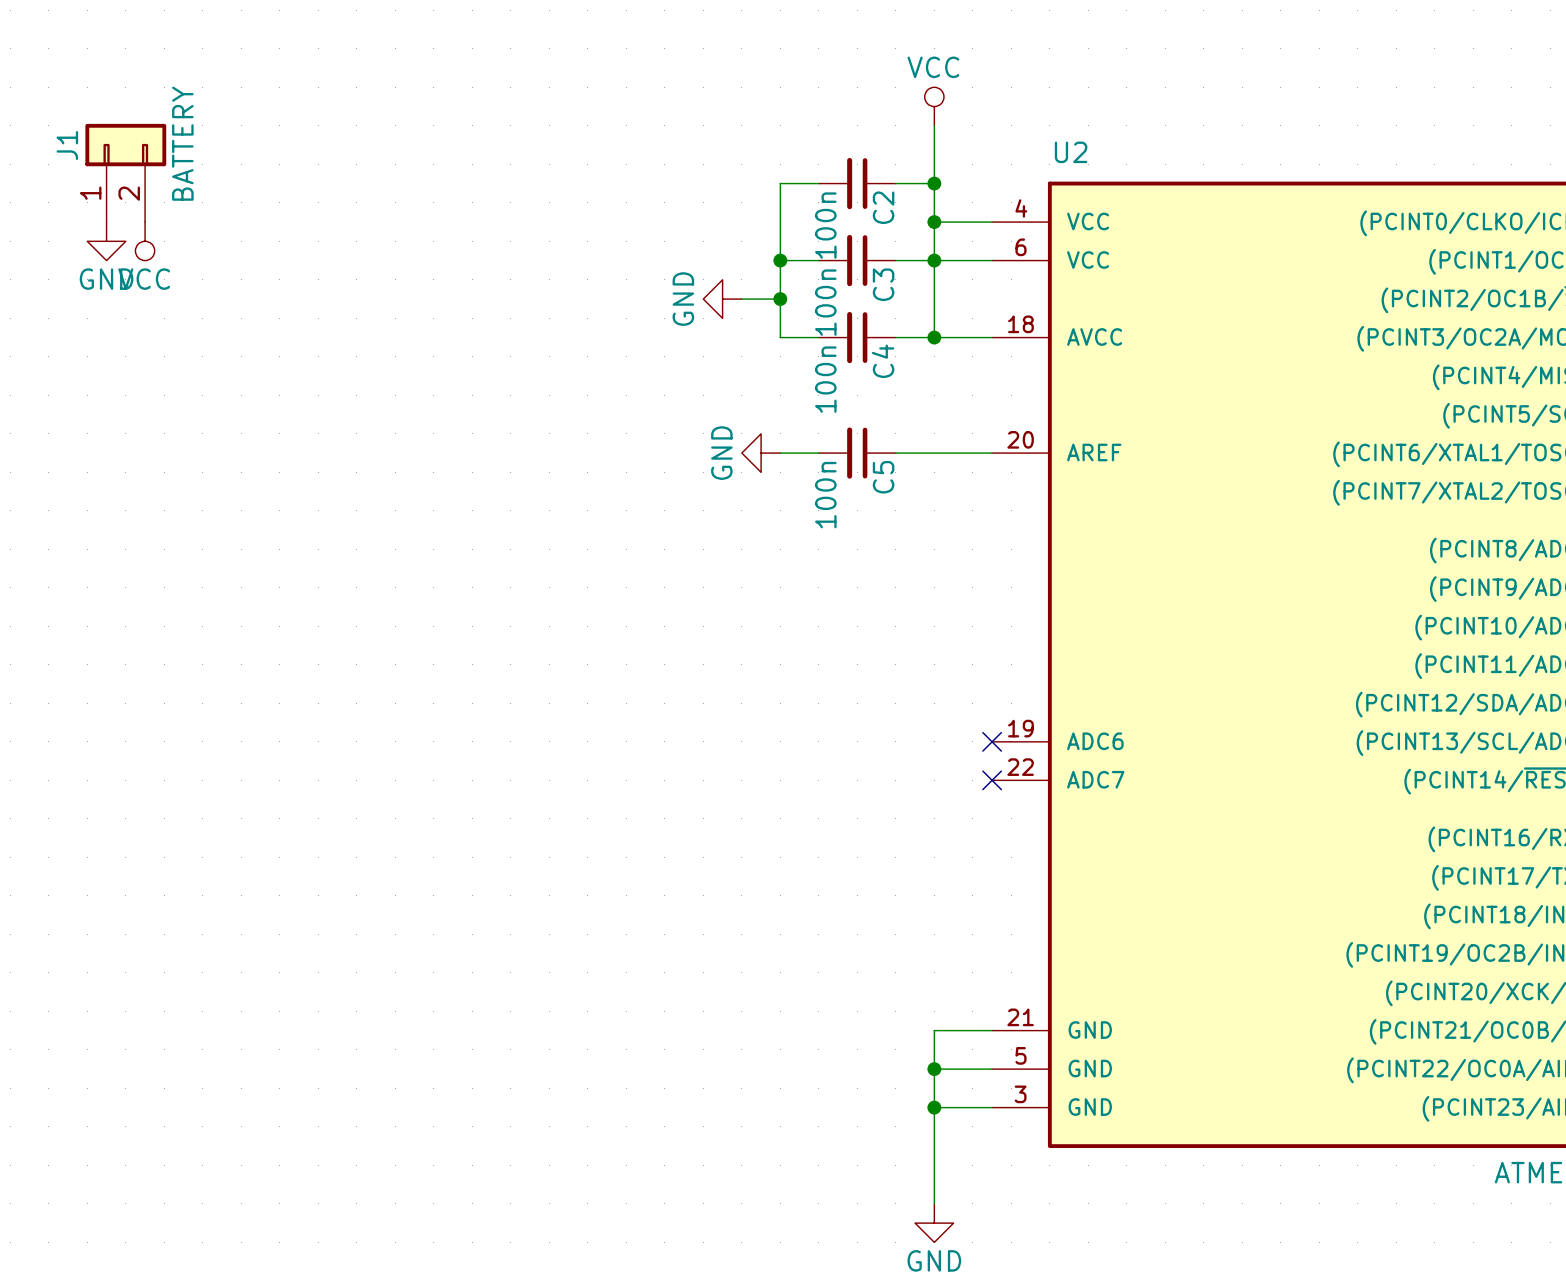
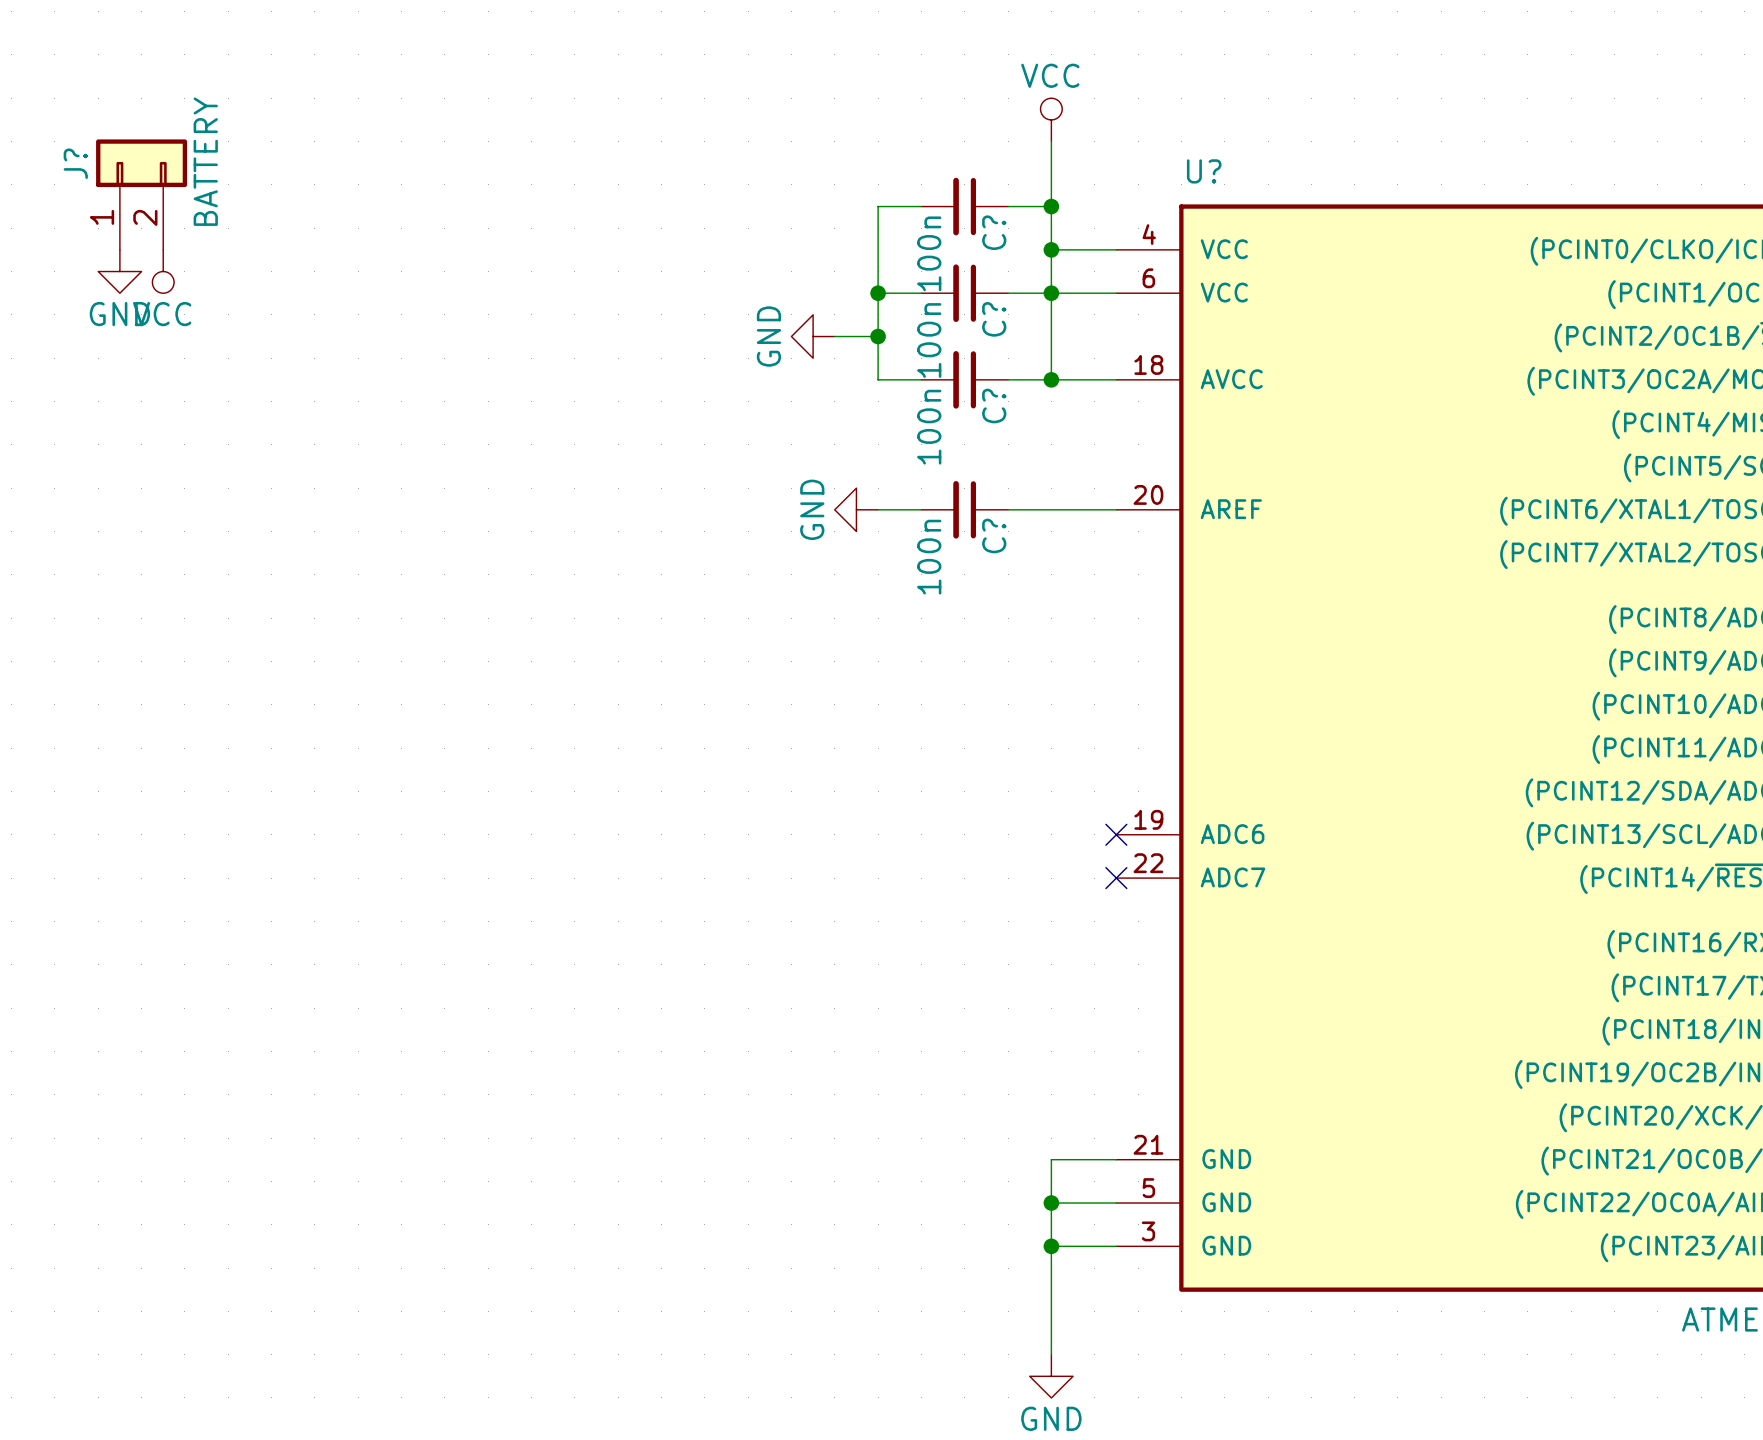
J1 name: J1 (67, 145) -> J? (75, 163)
U2 name: U2 (1071, 152) -> U? (1204, 171)
C2 name: C2 (883, 207) -> C? (994, 232)
C3 name: C3 (883, 284) -> C? (994, 319)
C4 name: C4 (883, 361) -> C? (994, 406)
C5 name: C5 (883, 477) -> C? (994, 535)

